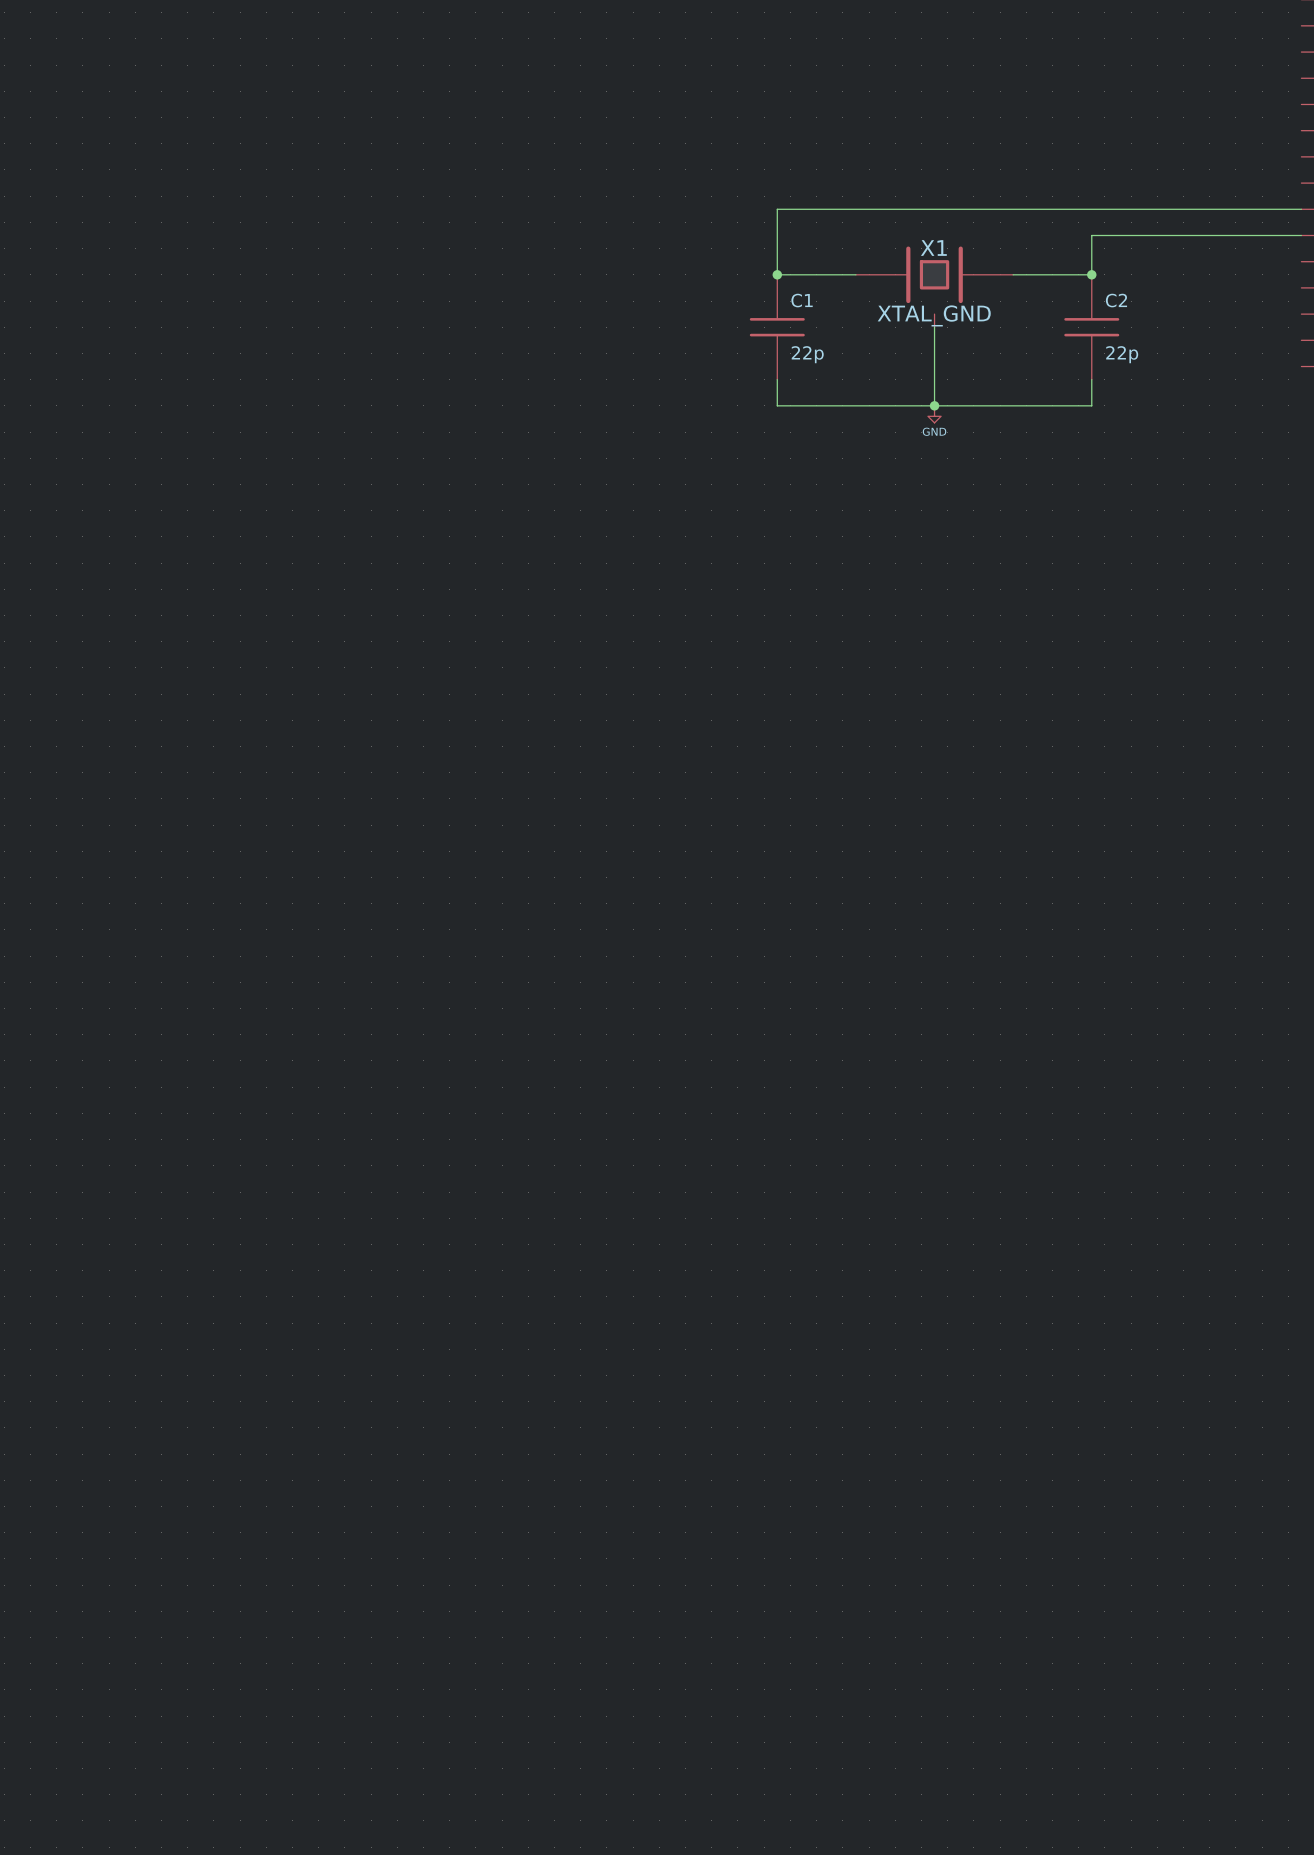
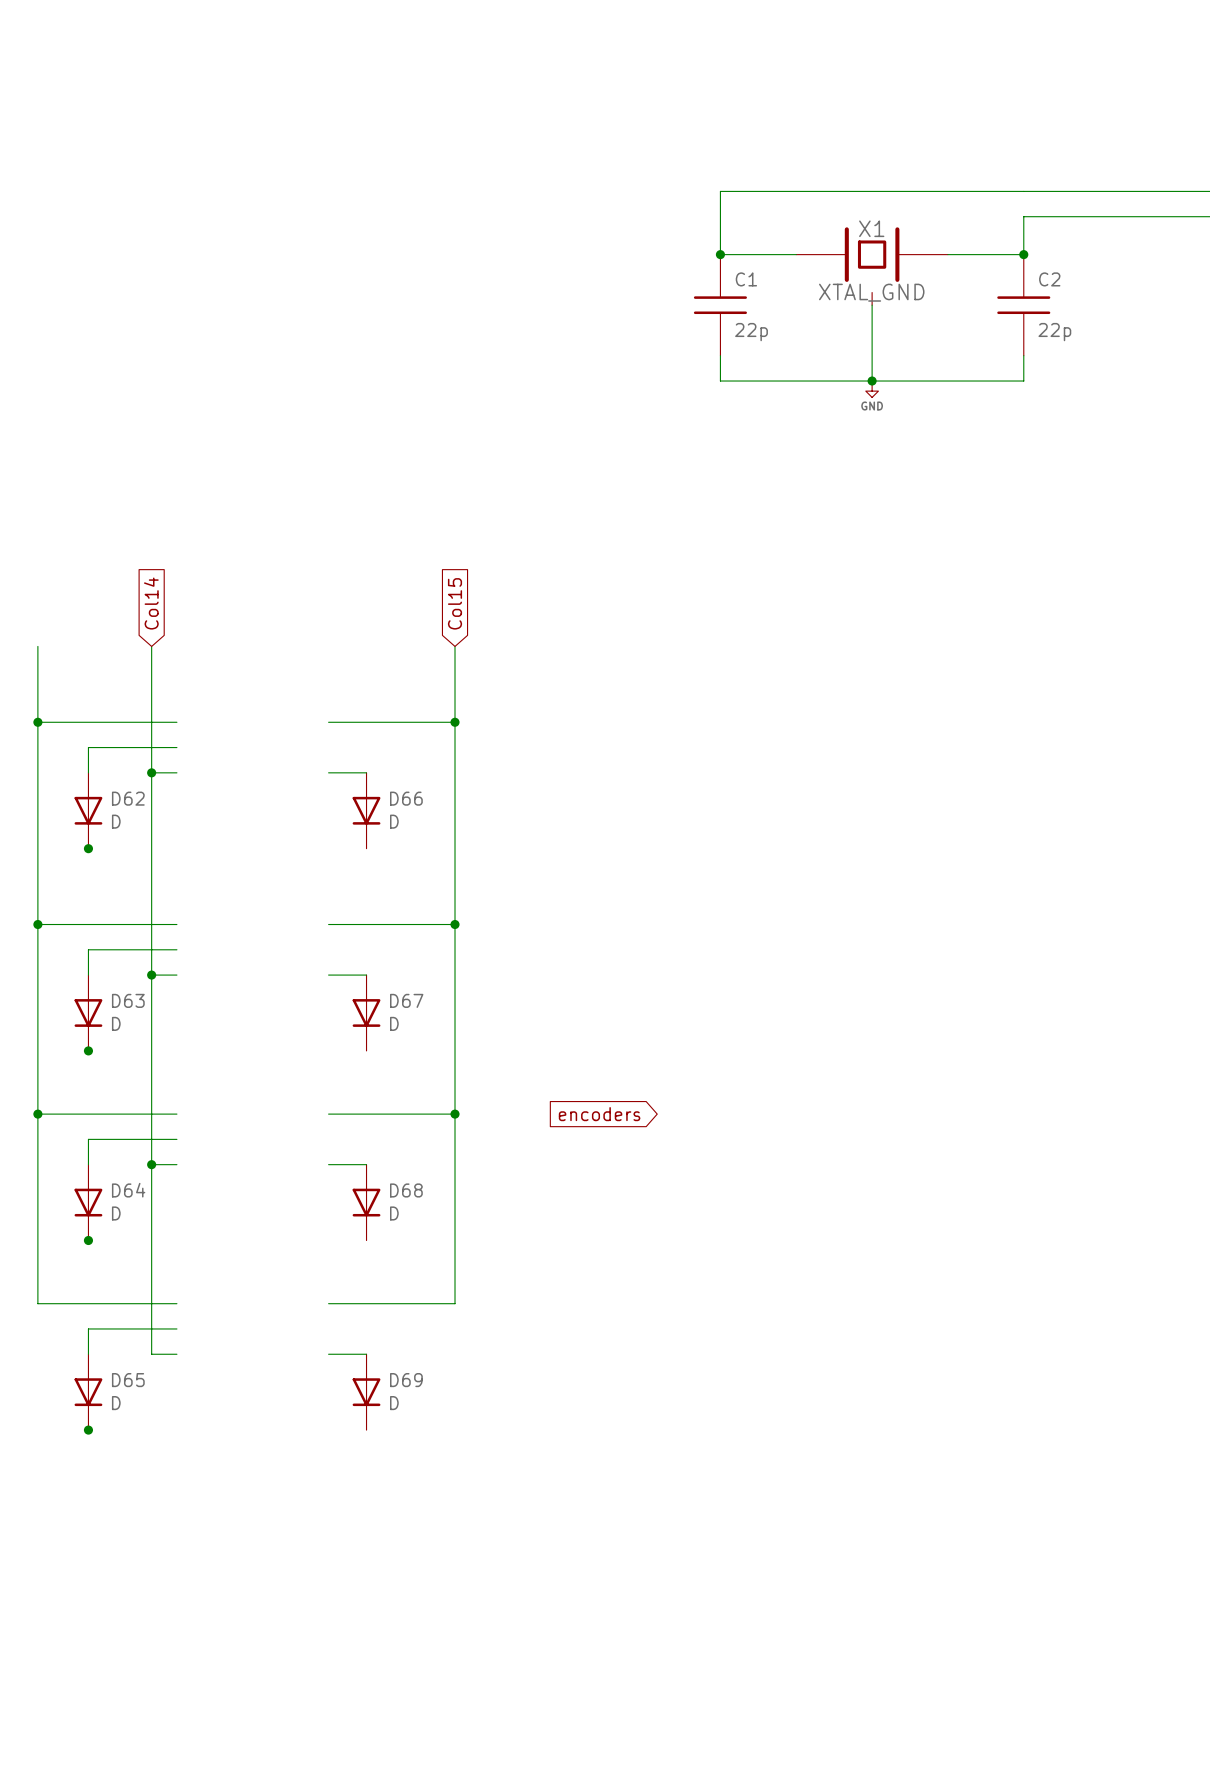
global label: none -> Col14 (151, 603)
global label: none -> Col15 (455, 603)
wire: none -> (37, 646) (37, 1303) (176, 1303)
wire: none -> (151, 646) (151, 1354) (176, 1354)
wire: none -> (455, 646) (455, 1303) (328, 1303)
wire: none -> (37, 722) (176, 722)
junction: none -> (37, 722)
wire: none -> (328, 722) (455, 722)
junction: none -> (455, 722)
wire: none -> (176, 747) (88, 747) (88, 772)
wire: none -> (151, 772) (176, 772)
junction: none -> (151, 772)
wire: none -> (328, 772) (366, 772)
D62: none -> D (88, 810)
D66: none -> D (366, 810)
junction: none -> (88, 848)
wire: none -> (37, 924) (176, 924)
junction: none -> (37, 924)
wire: none -> (328, 924) (455, 924)
junction: none -> (455, 924)
wire: none -> (176, 949) (88, 949) (88, 975)
wire: none -> (151, 975) (176, 975)
junction: none -> (151, 975)
wire: none -> (328, 975) (366, 975)
D63: none -> D (88, 1012)
D67: none -> D (366, 1012)
junction: none -> (88, 1050)
wire: none -> (37, 1114) (176, 1114)
junction: none -> (37, 1114)
wire: none -> (328, 1114) (455, 1114)
junction: none -> (455, 1114)
global label: none -> encoders (599, 1114)
wire: none -> (176, 1139) (88, 1139) (88, 1164)
wire: none -> (151, 1164) (176, 1164)
junction: none -> (151, 1164)
wire: none -> (328, 1164) (366, 1164)
D64: none -> D (88, 1202)
D68: none -> D (366, 1202)
junction: none -> (88, 1240)
wire: none -> (176, 1328) (88, 1328) (88, 1354)
wire: none -> (328, 1354) (366, 1354)
D65: none -> D (88, 1392)
D69: none -> D (366, 1392)
junction: none -> (88, 1430)

